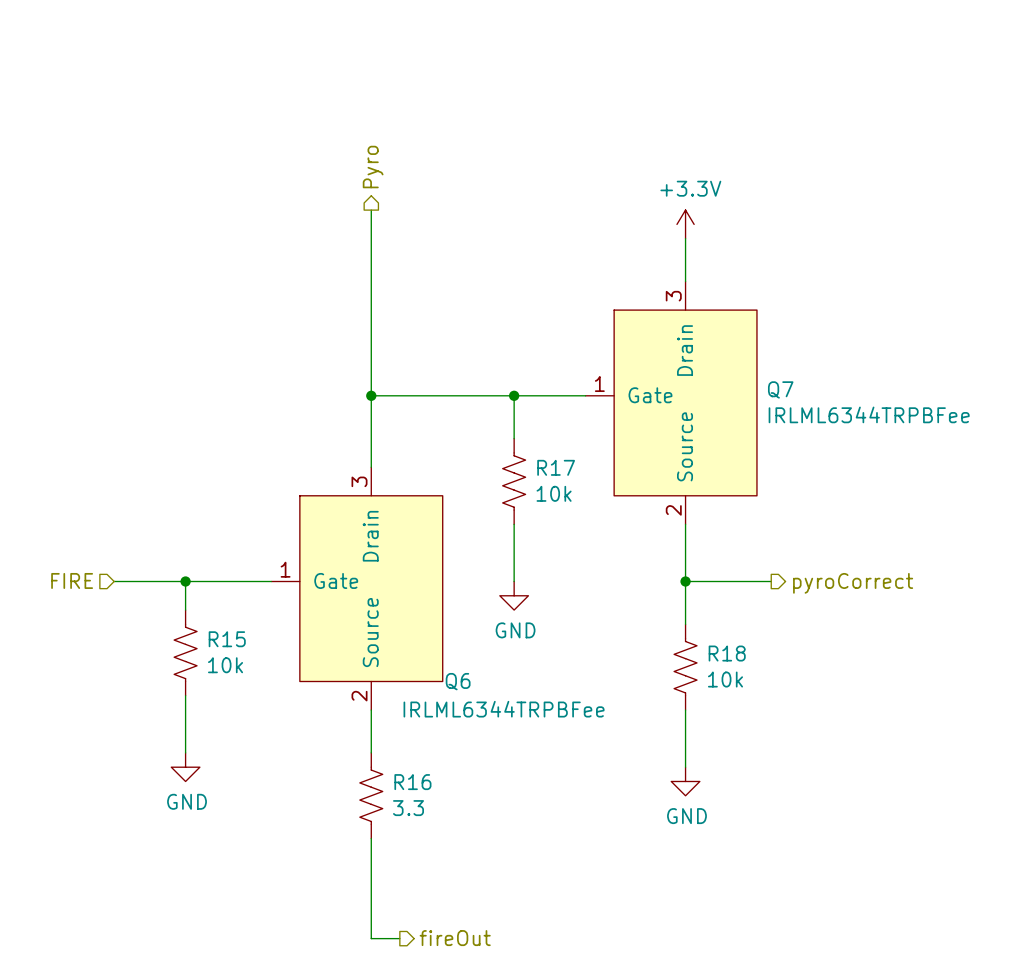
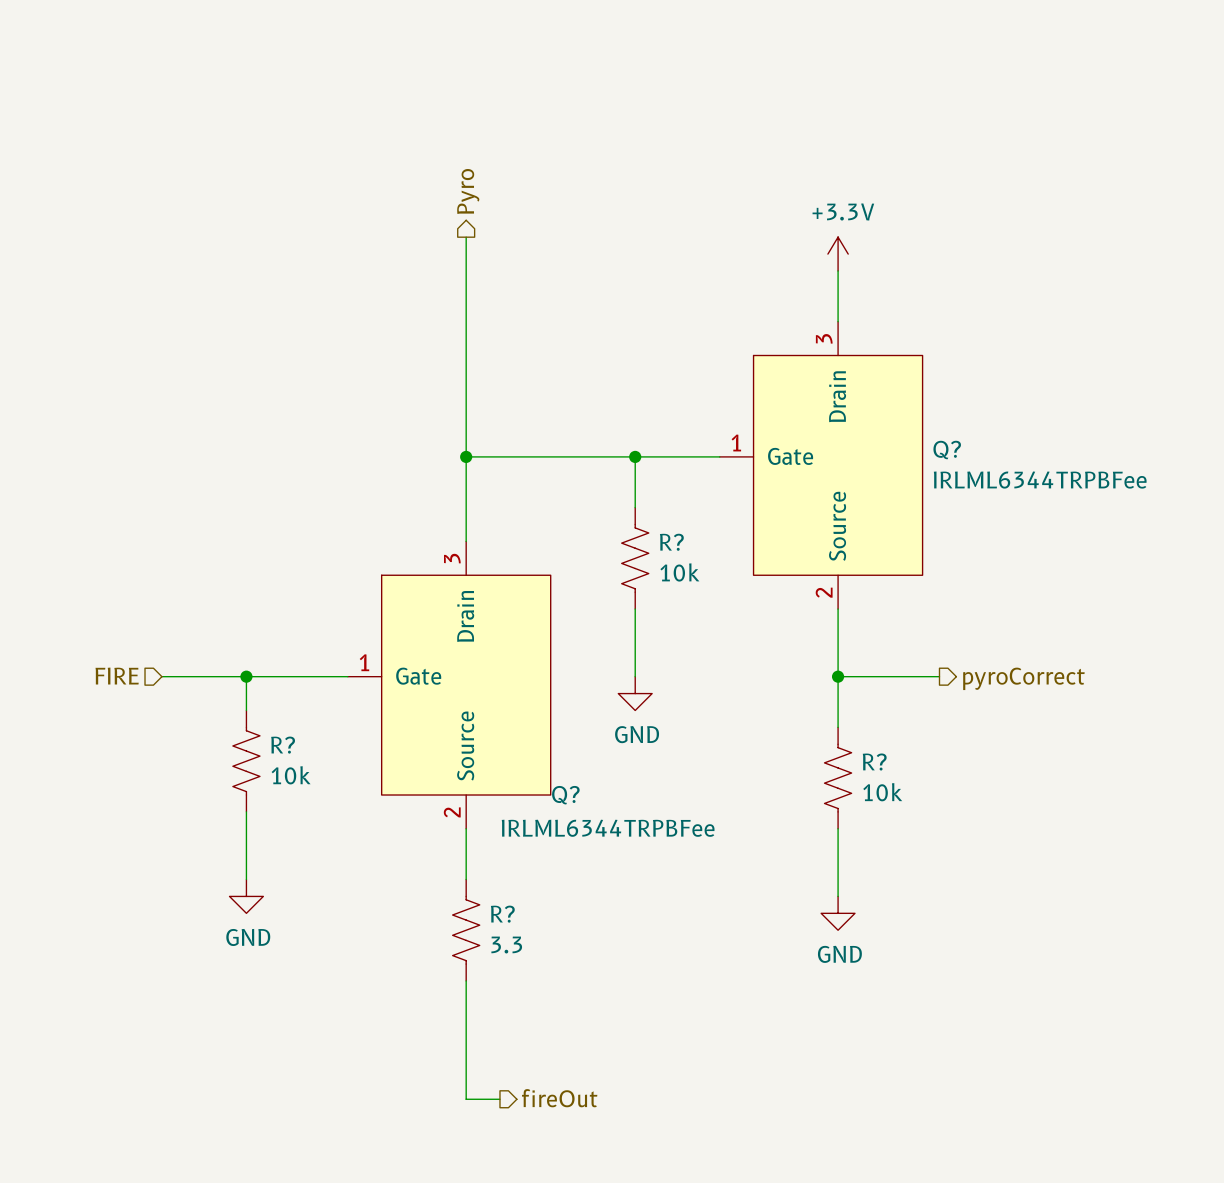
Q7 name: Q7 (780, 389) -> Q? (947, 450)
R17 name: R17 (556, 467) -> R? (671, 542)
R15 name: R15 (227, 639) -> R? (283, 745)
R18 name: R18 (727, 653) -> R? (874, 762)
Q6 name: Q6 (458, 681) -> Q? (565, 795)
R16 name: R16 (412, 782) -> R? (502, 914)

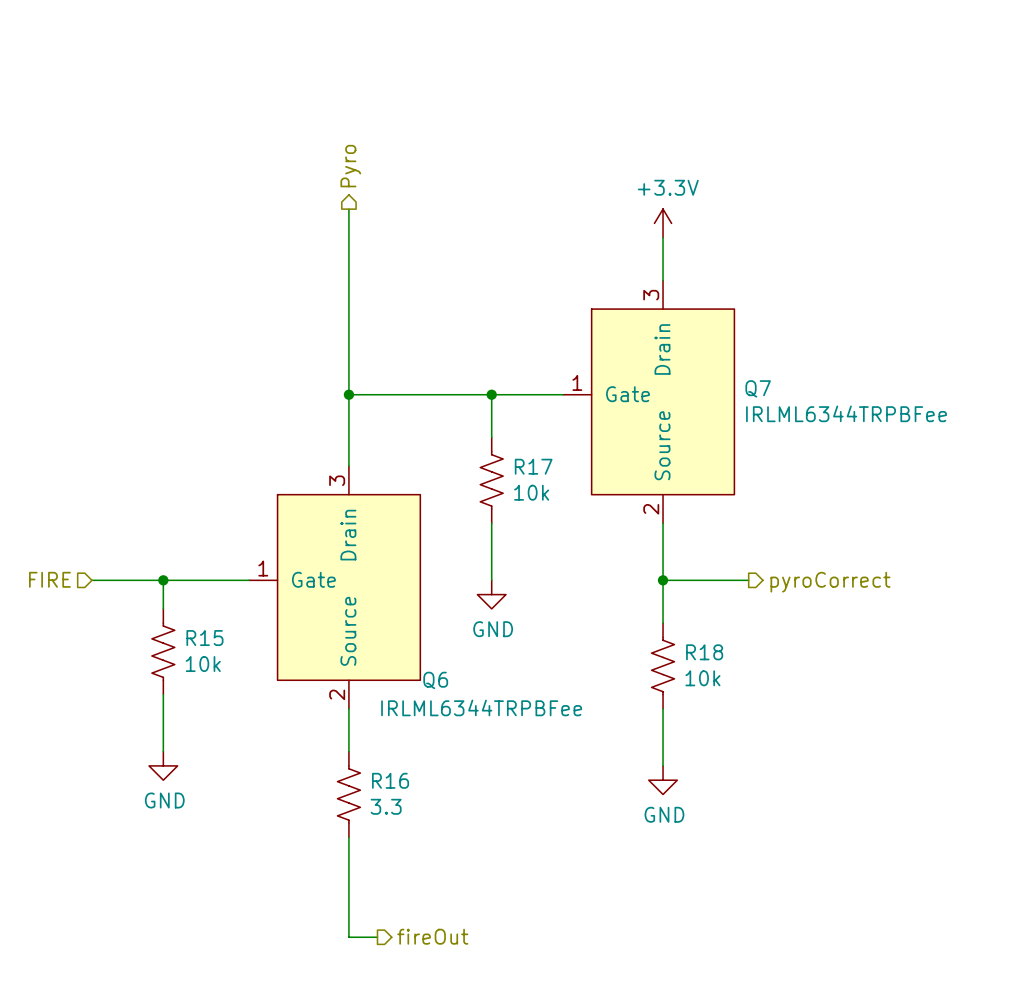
Q? name: Q? (947, 450) -> Q7 (758, 388)
R? name: R? (671, 542) -> R17 (533, 466)
R? name: R? (283, 745) -> R15 (204, 638)
R? name: R? (874, 762) -> R18 (704, 652)
Q? name: Q? (565, 795) -> Q6 (435, 680)
R? name: R? (502, 914) -> R16 (390, 780)

